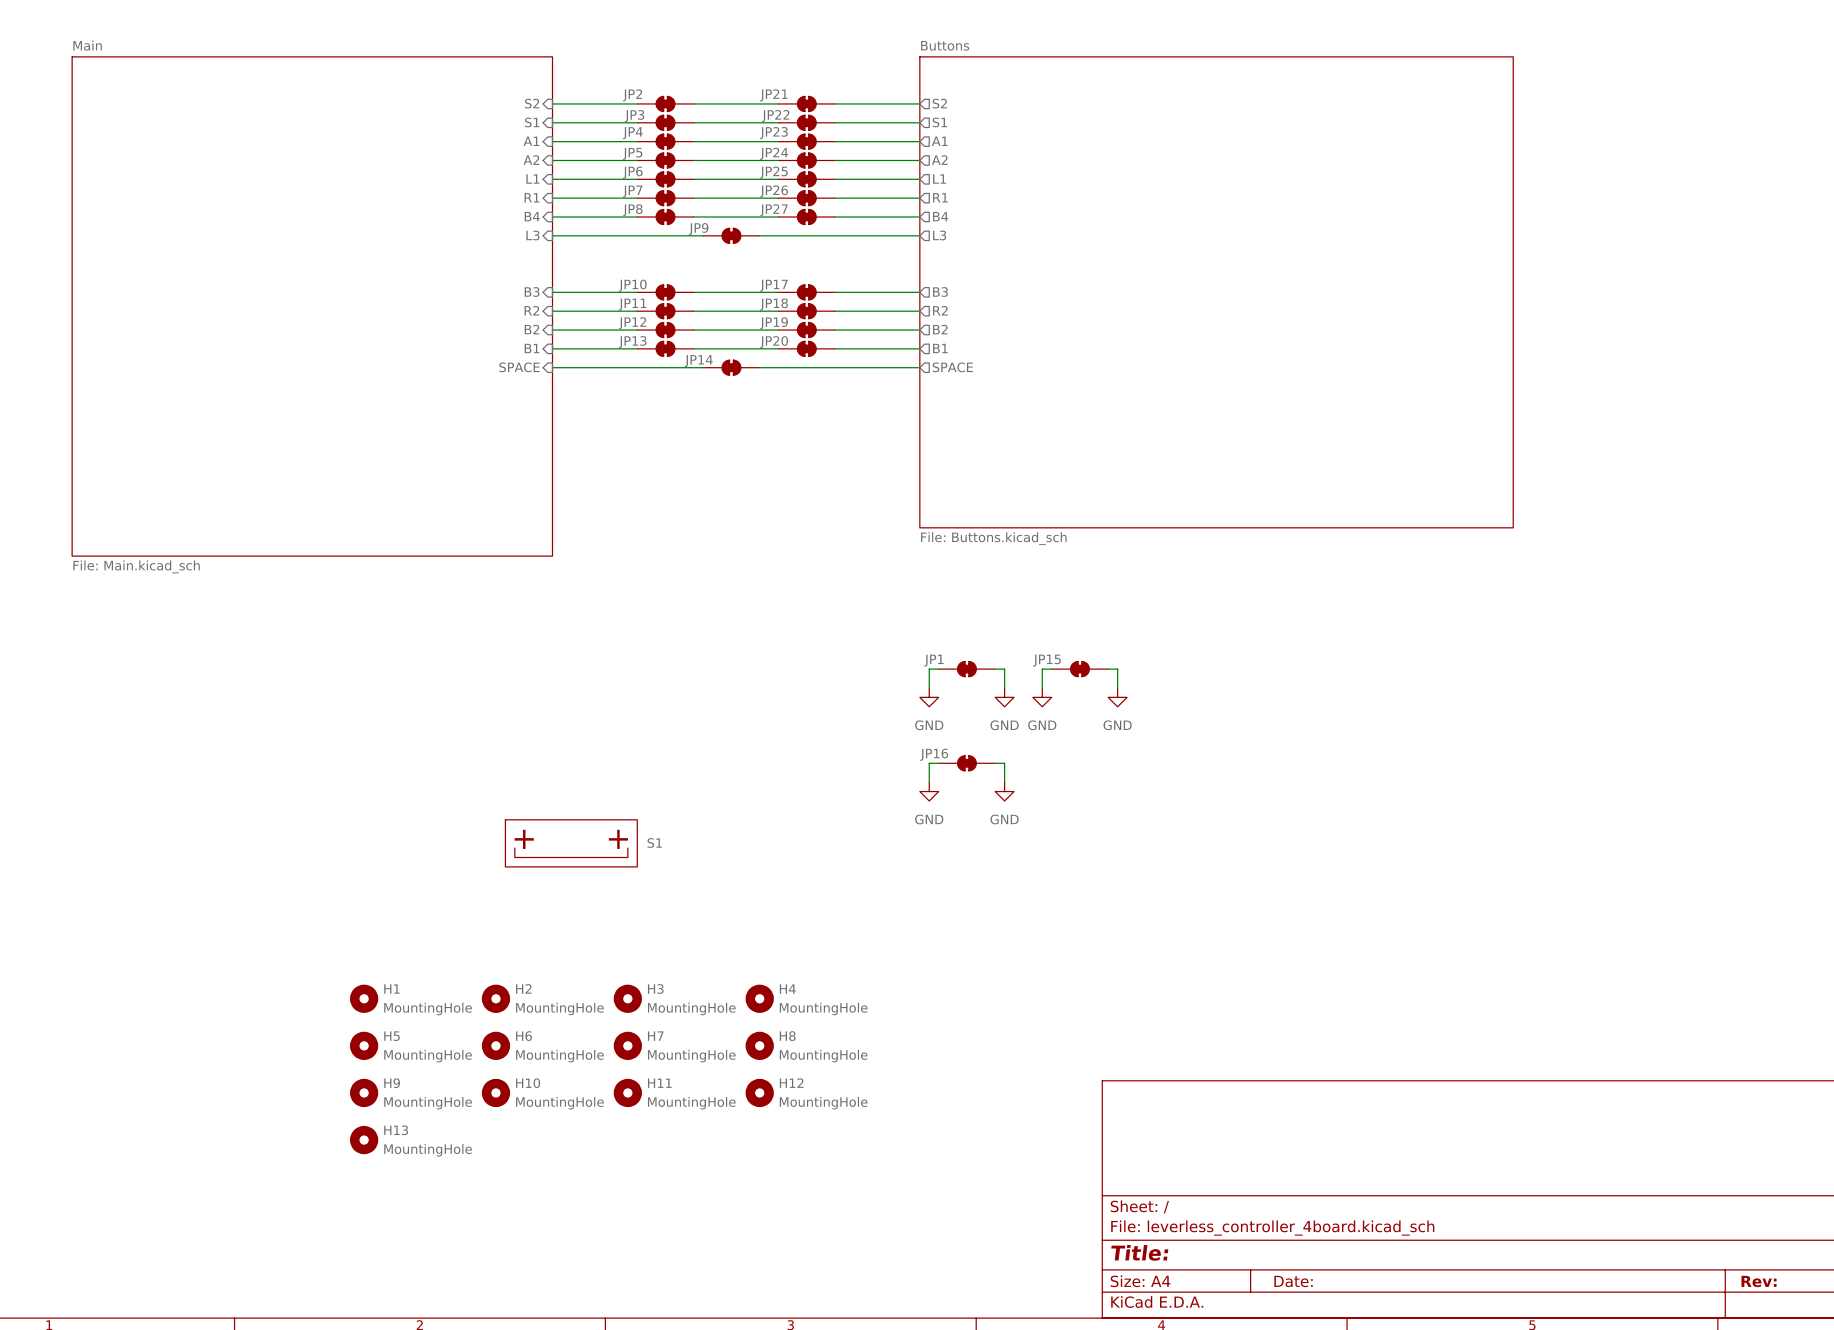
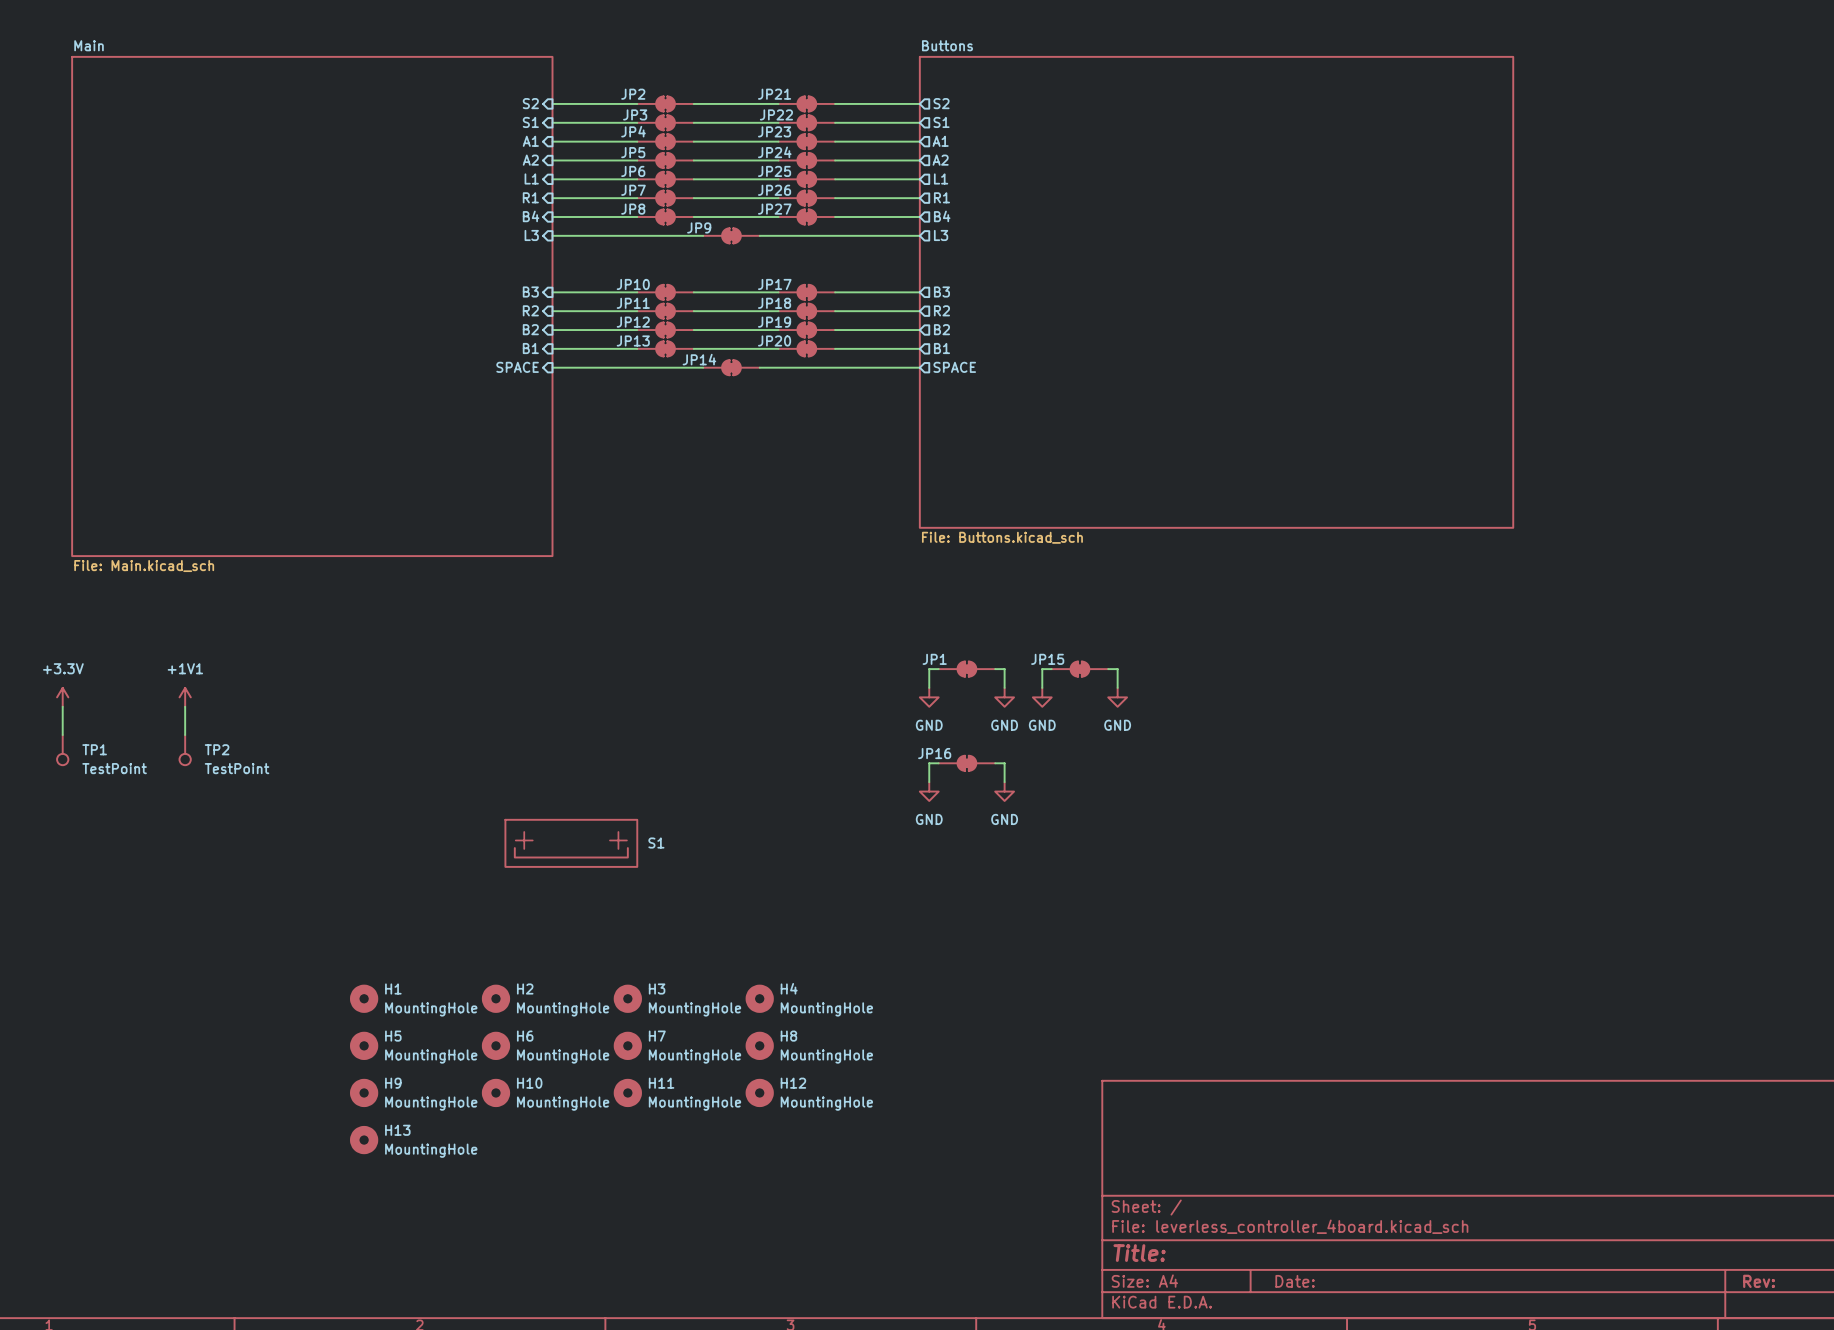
power symbol: none -> +3.3V (62, 697)
power symbol: none -> +1V1 (185, 697)
wire: none -> (62, 706) (62, 735)
wire: none -> (185, 706) (185, 735)
TP1: none -> TestPoint (62, 750)
TP2: none -> TestPoint (185, 750)

